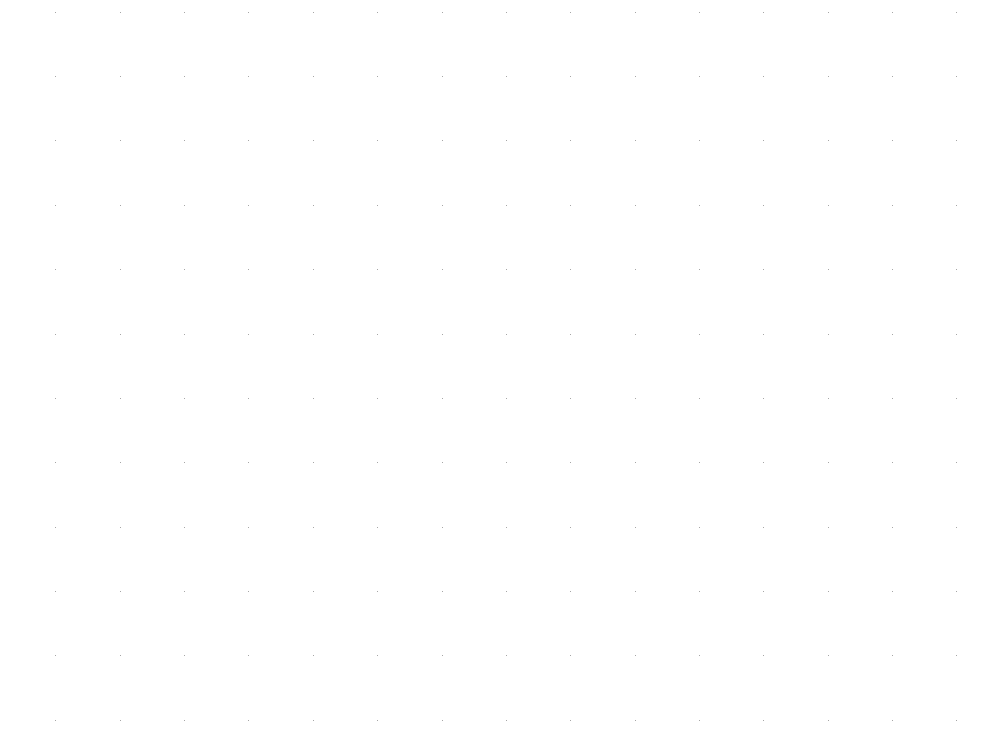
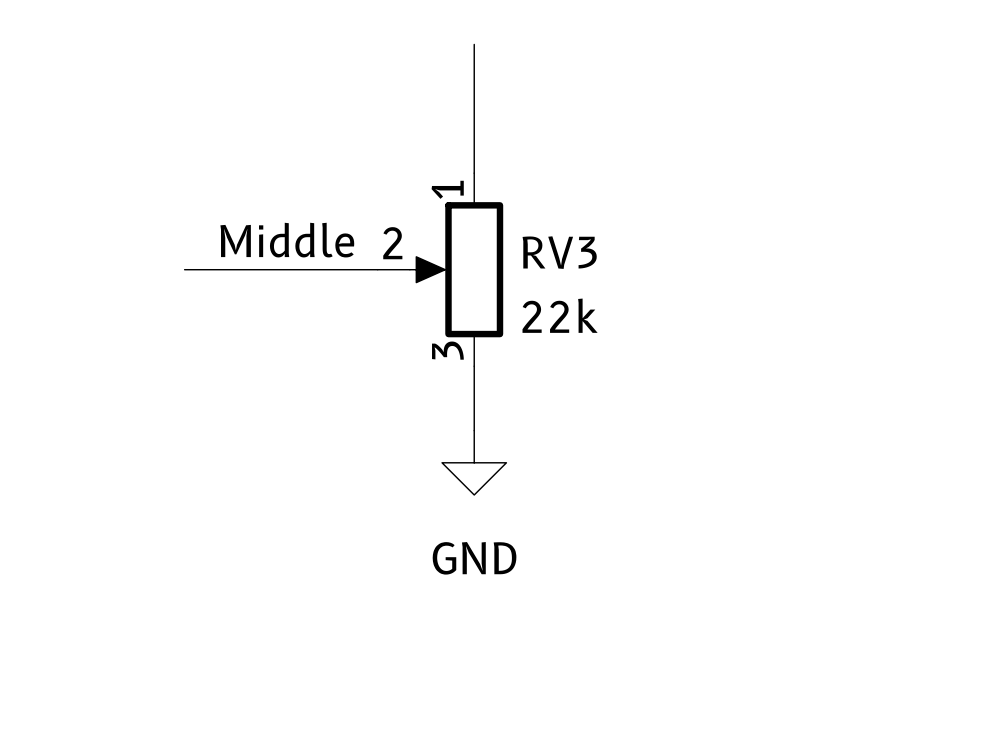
wire: none -> (474, 44) (474, 173)
label: none -> Middle (287, 240)
wire: none -> (184, 269) (377, 269)
RV3: none -> 22k (440, 269)
wire: none -> (474, 366) (474, 430)
power symbol: none -> GND (474, 462)

